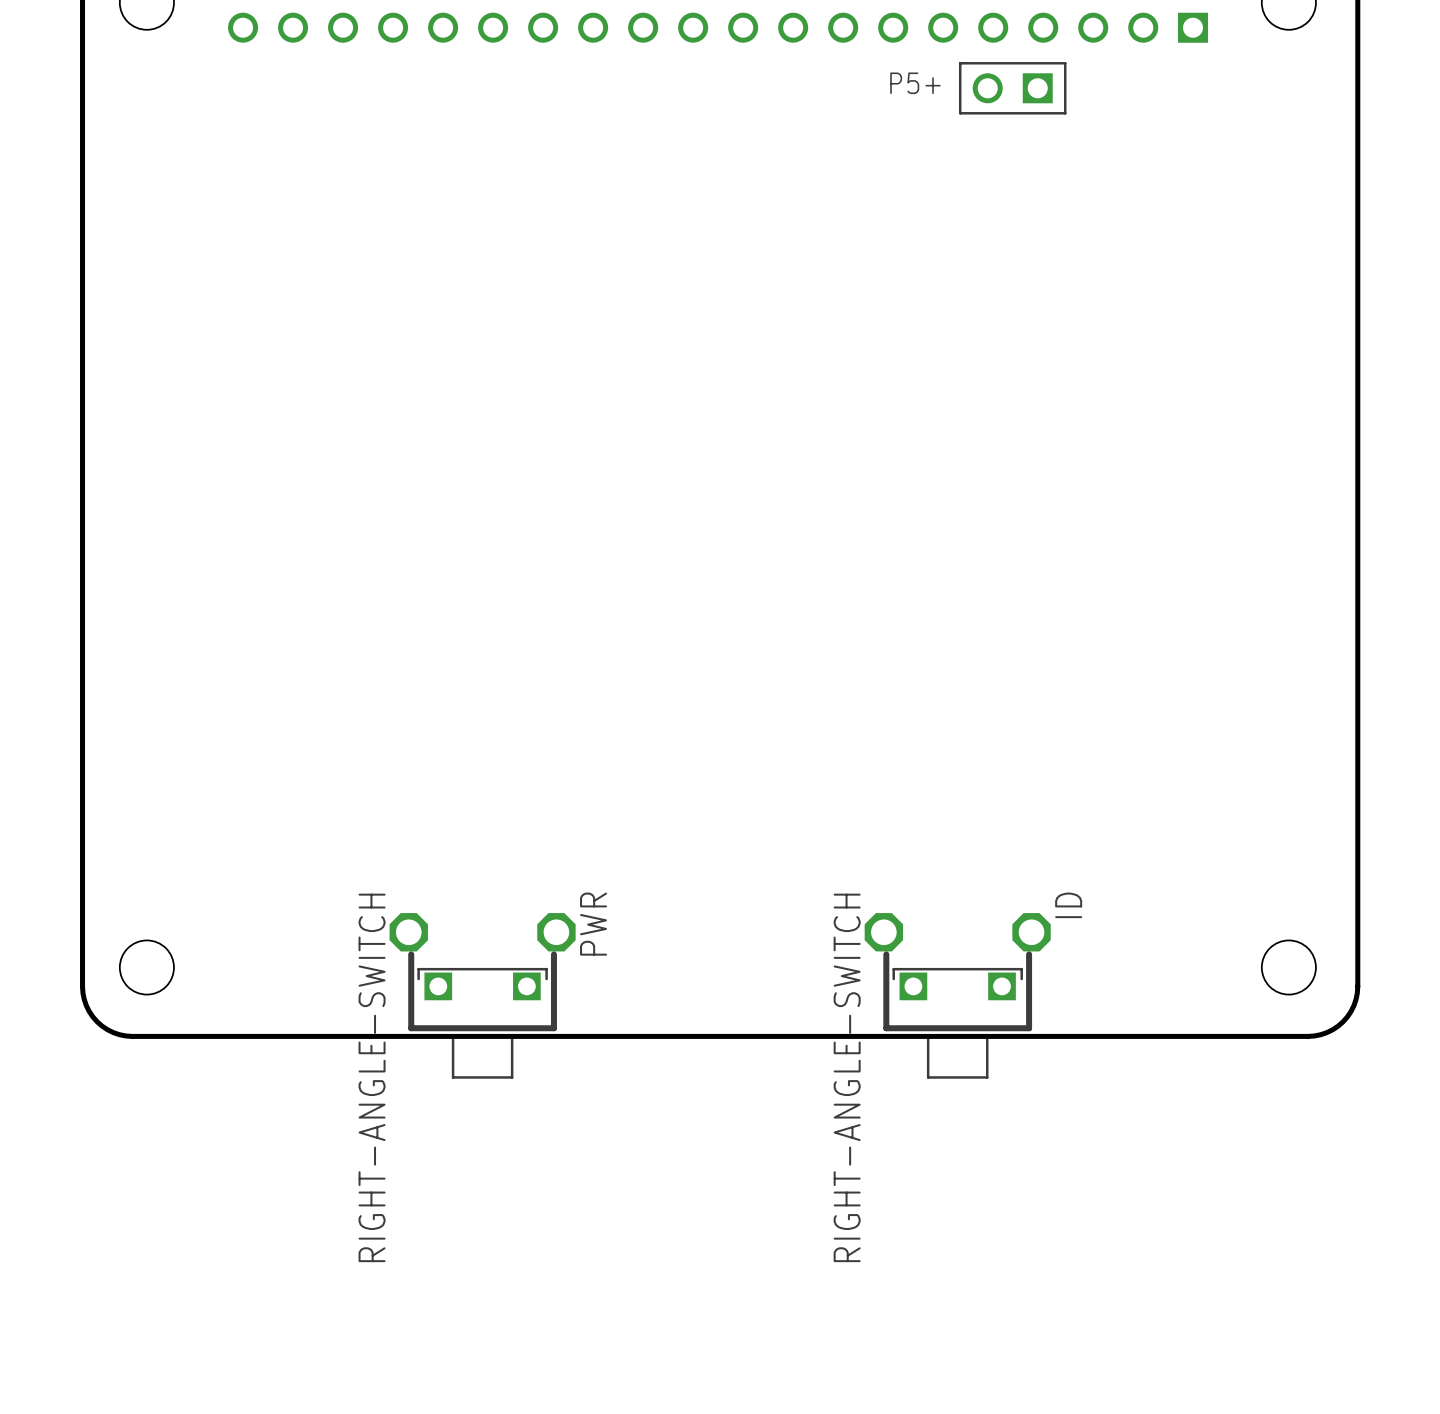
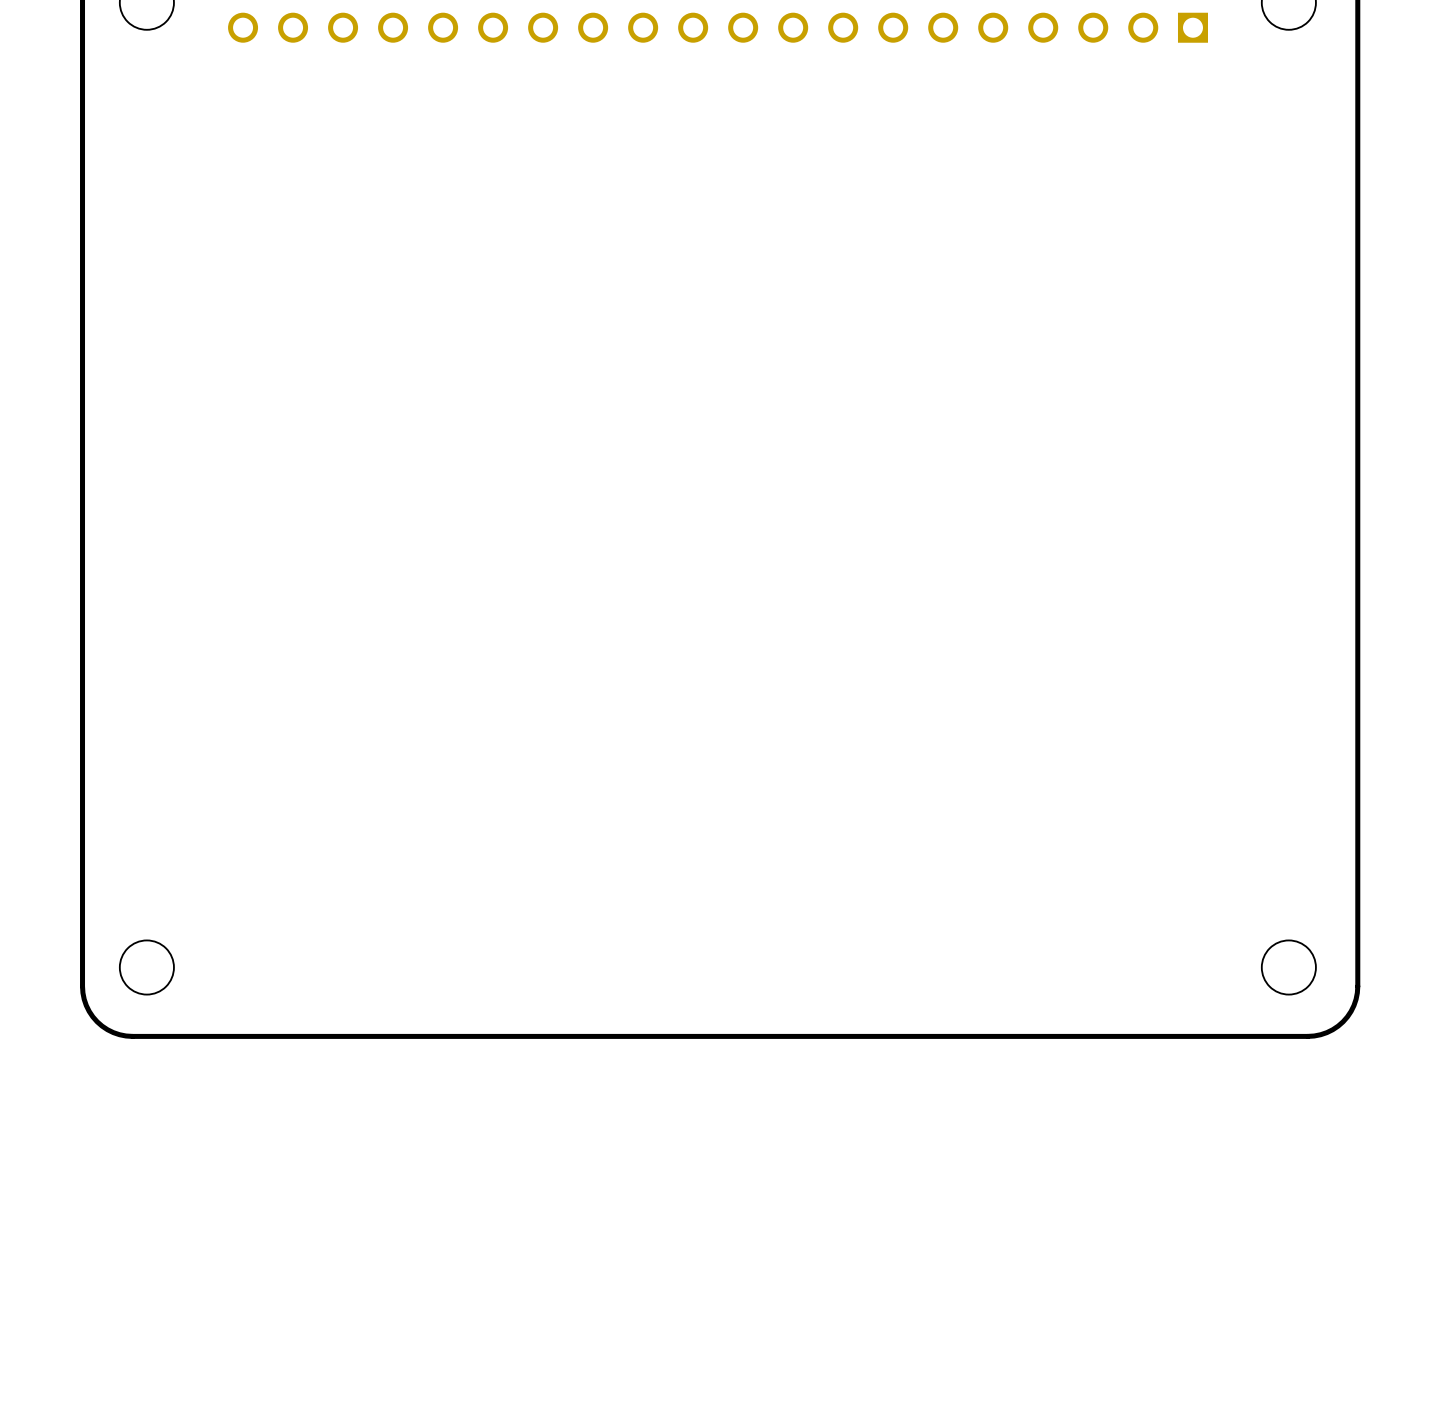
P5+: (1012, 88) -> none
PWR: RIGHT-ANGLE-SWITCH (482, 995) -> none
ID: RIGHT-ANGLE-SWITCH (957, 995) -> none

